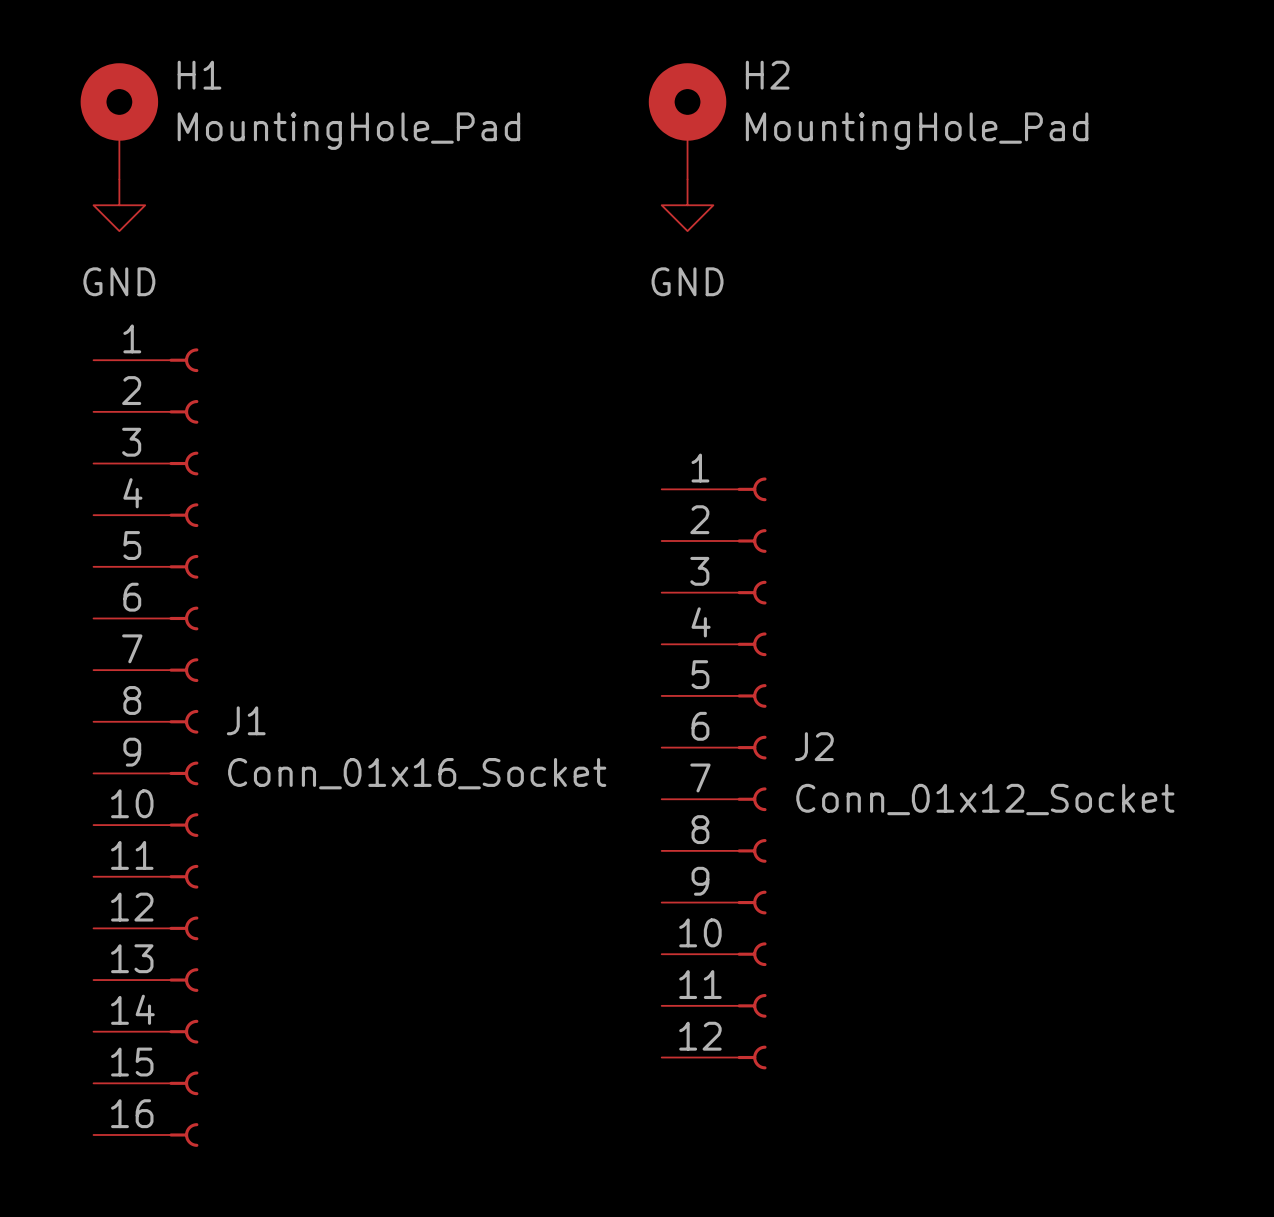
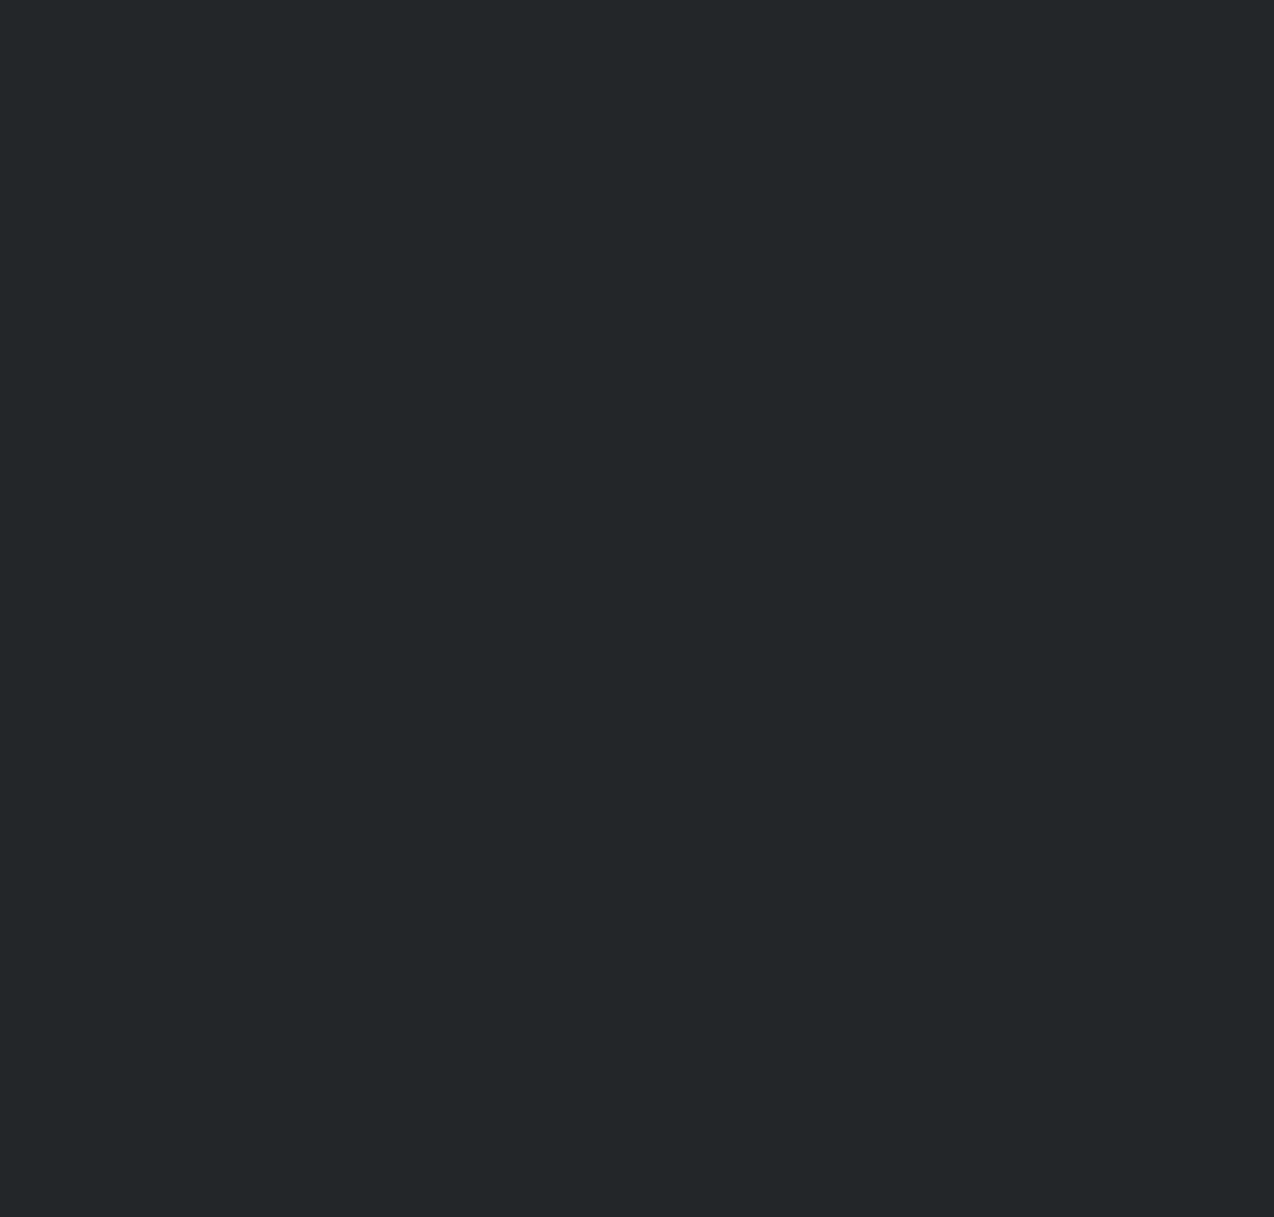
H1: MountingHole_Pad (119, 121) -> none
H2: MountingHole_Pad (687, 121) -> none
power symbol: GND (119, 205) -> none
power symbol: GND (687, 205) -> none
J1: Conn_01x16_Socket (145, 747) -> none
J2: Conn_01x12_Socket (714, 773) -> none

